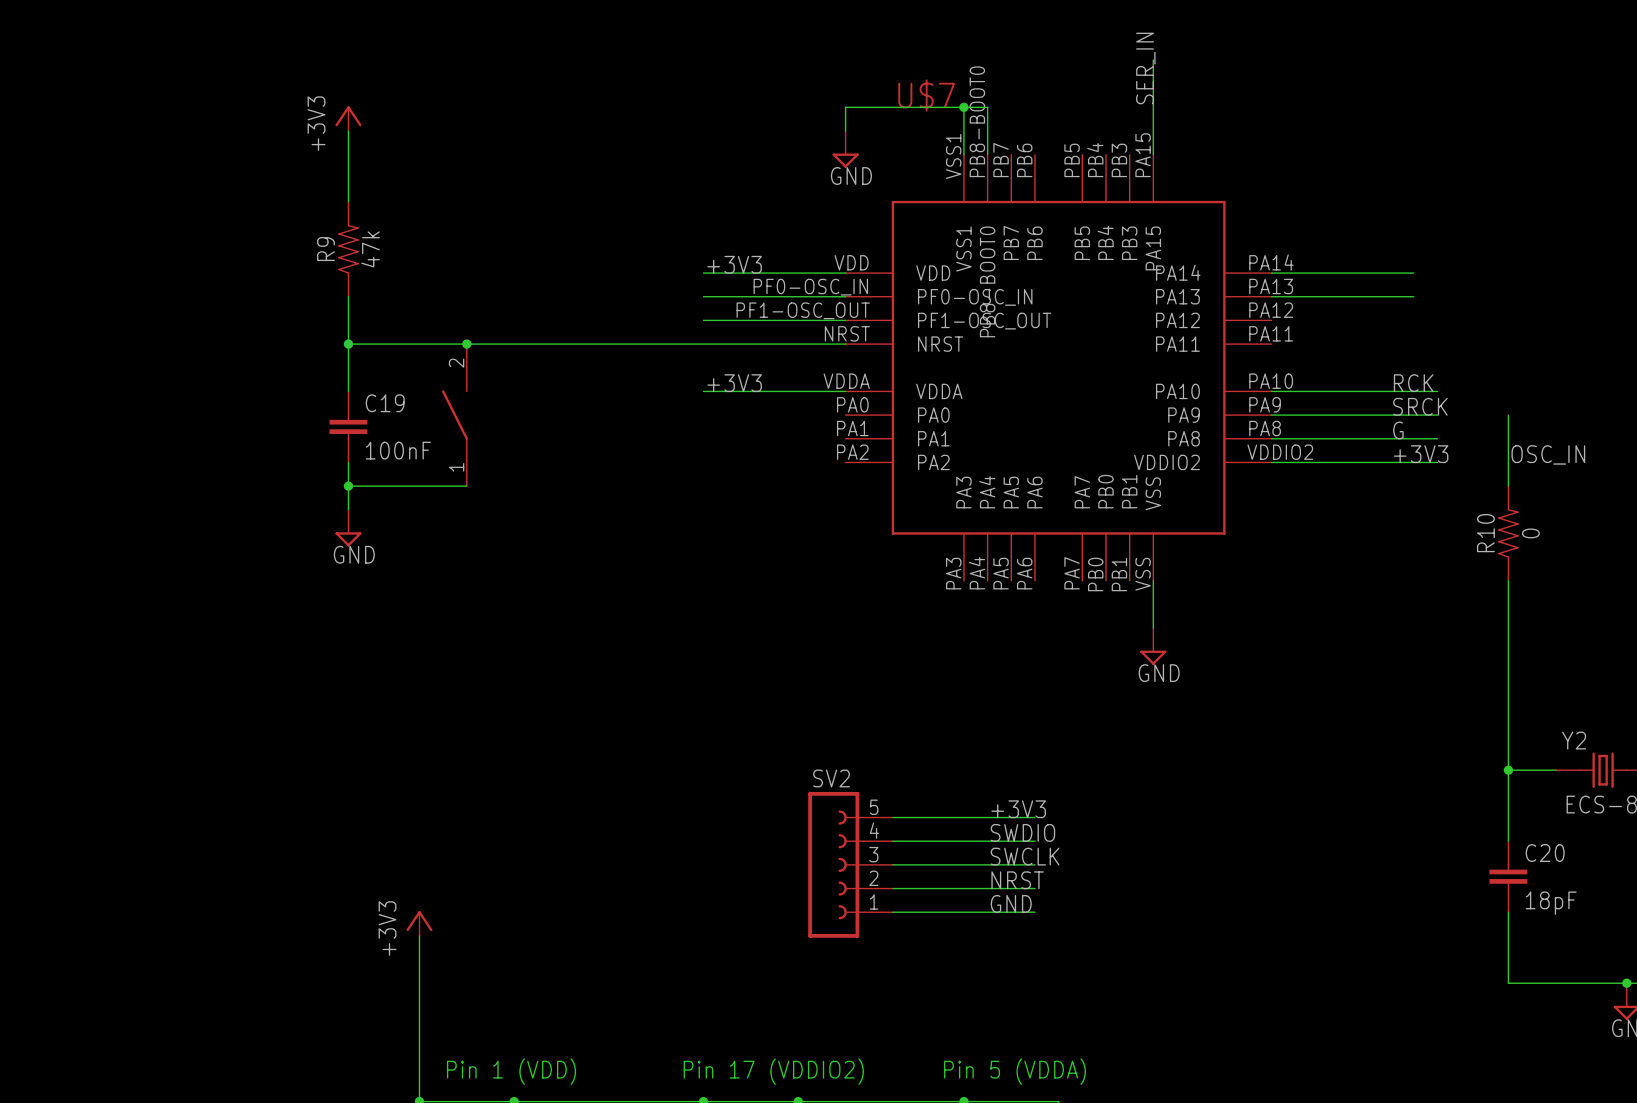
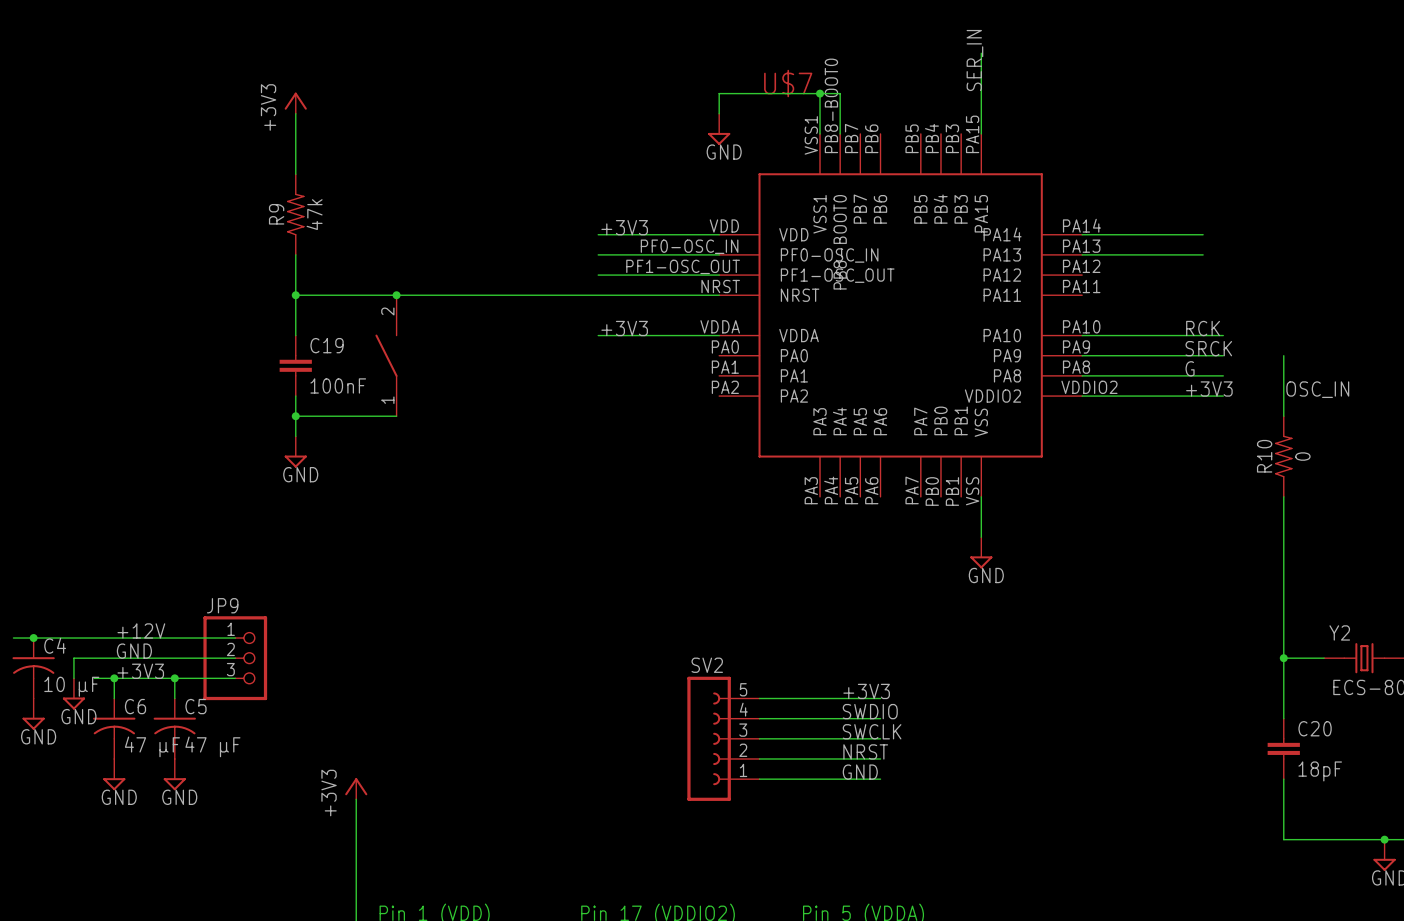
label: none -> +12V (141, 630)
wire: none -> (13, 638) (235, 638)
junction: none -> (33, 638)
label: none -> GND (134, 651)
wire: none -> (235, 658) (73, 658) (73, 678)
JP9: none -> (235, 658)
C4: none -> 10 µF (33, 668)
label: none -> +3V3 (140, 671)
wire: none -> (94, 678) (235, 678)
wire: none -> (114, 678) (114, 698)
junction: none -> (114, 678)
wire: none -> (174, 678) (174, 698)
junction: none -> (174, 678)
power symbol: none -> GND (73, 693)
power symbol: none -> GND (33, 714)
C6: none -> 47 µF (114, 728)
C5: none -> 47 µF (174, 728)
power symbol: none -> GND (114, 774)
power symbol: none -> GND (174, 774)

